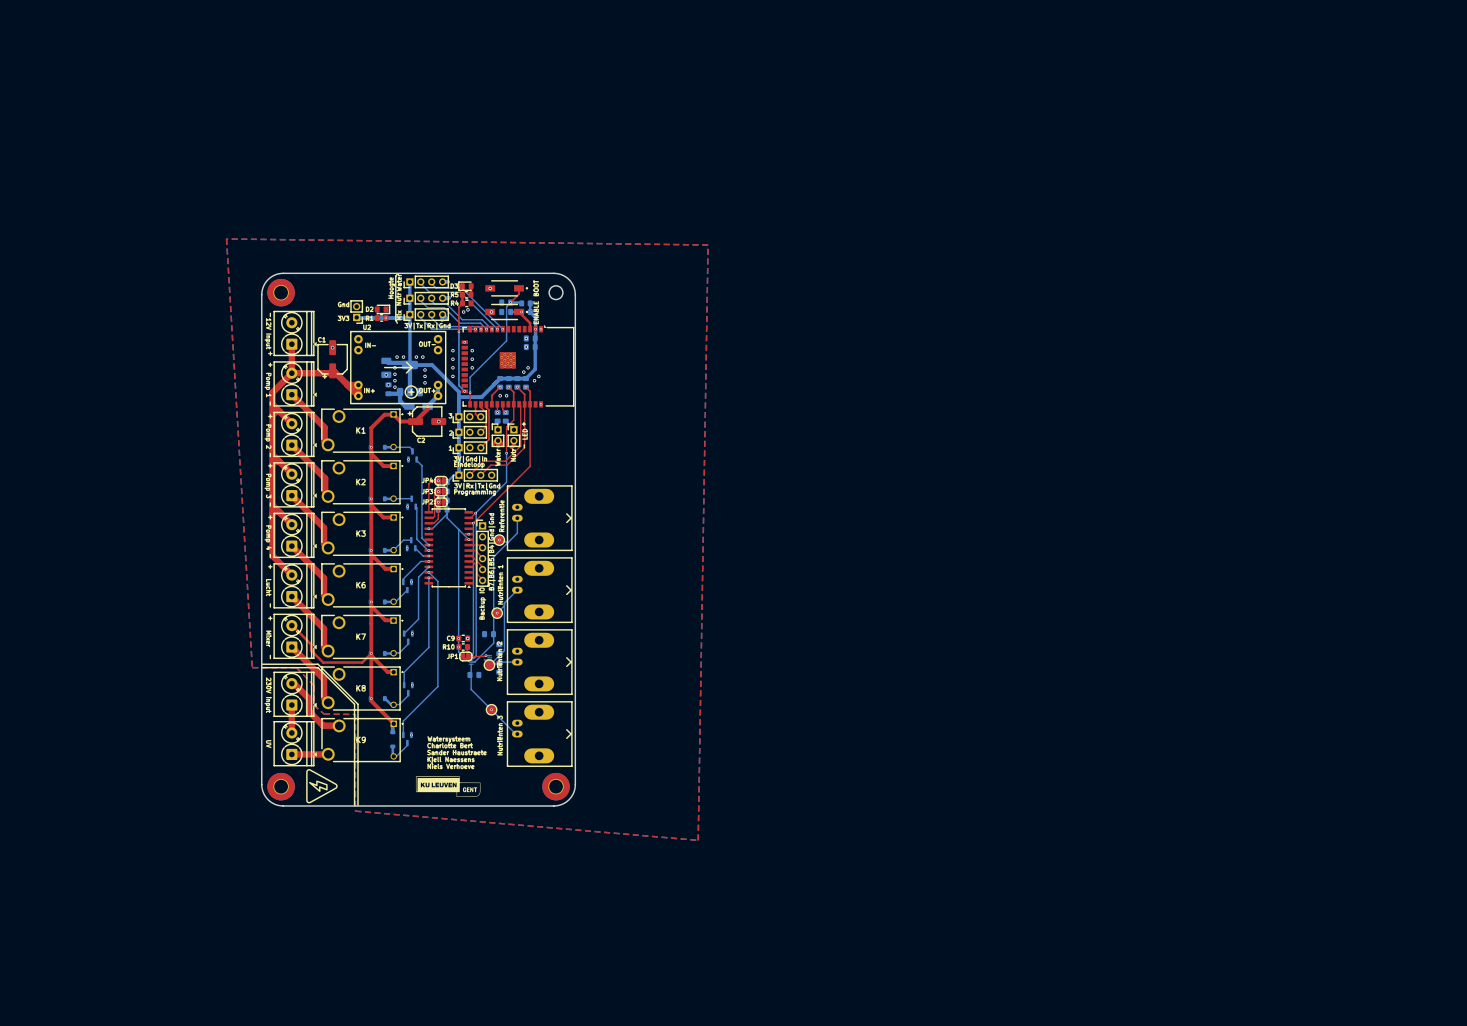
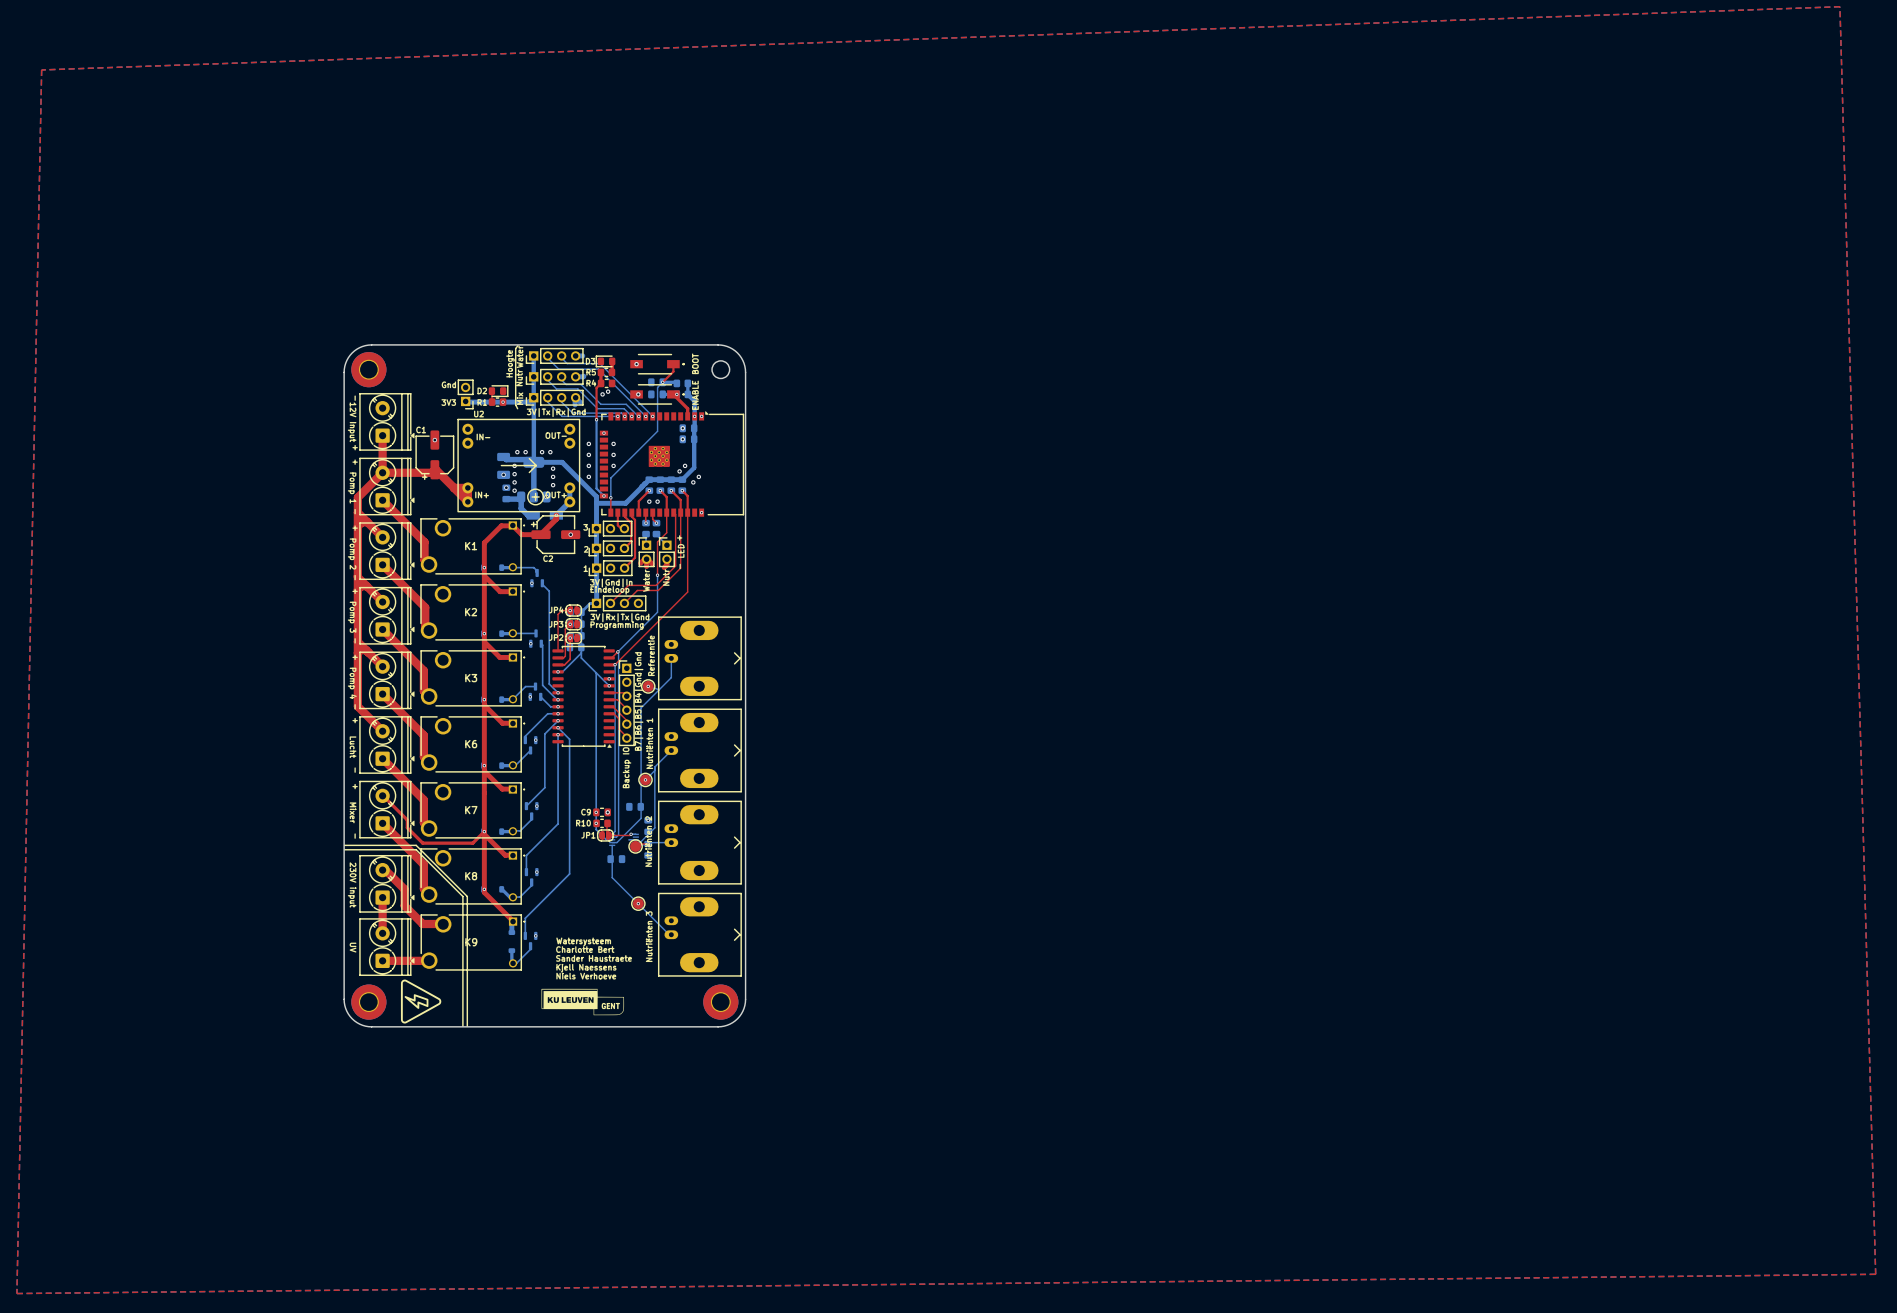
top zone outline: none -> (1839, 6) (1875, 1274) (16, 1293) (41, 69) (1839, 6)
top zone outline: (226, 238) (252, 667) (296, 667) (314, 685) (313, 705) (324, 714) (355, 714) (355, 811) (698, 840) (708, 244) (226, 238) -> none

